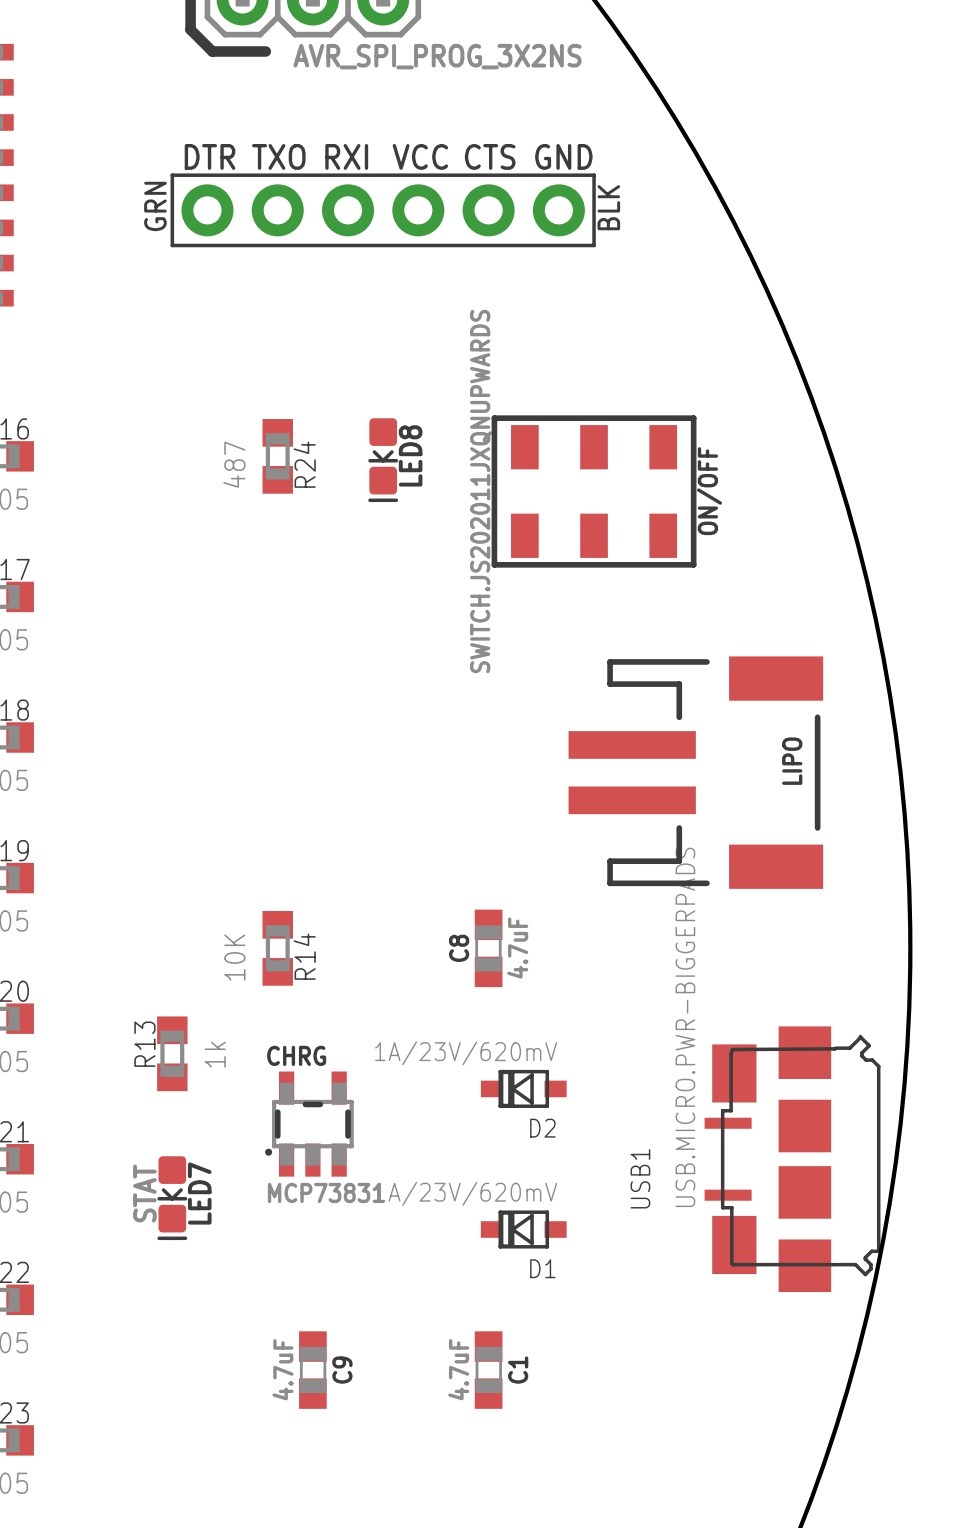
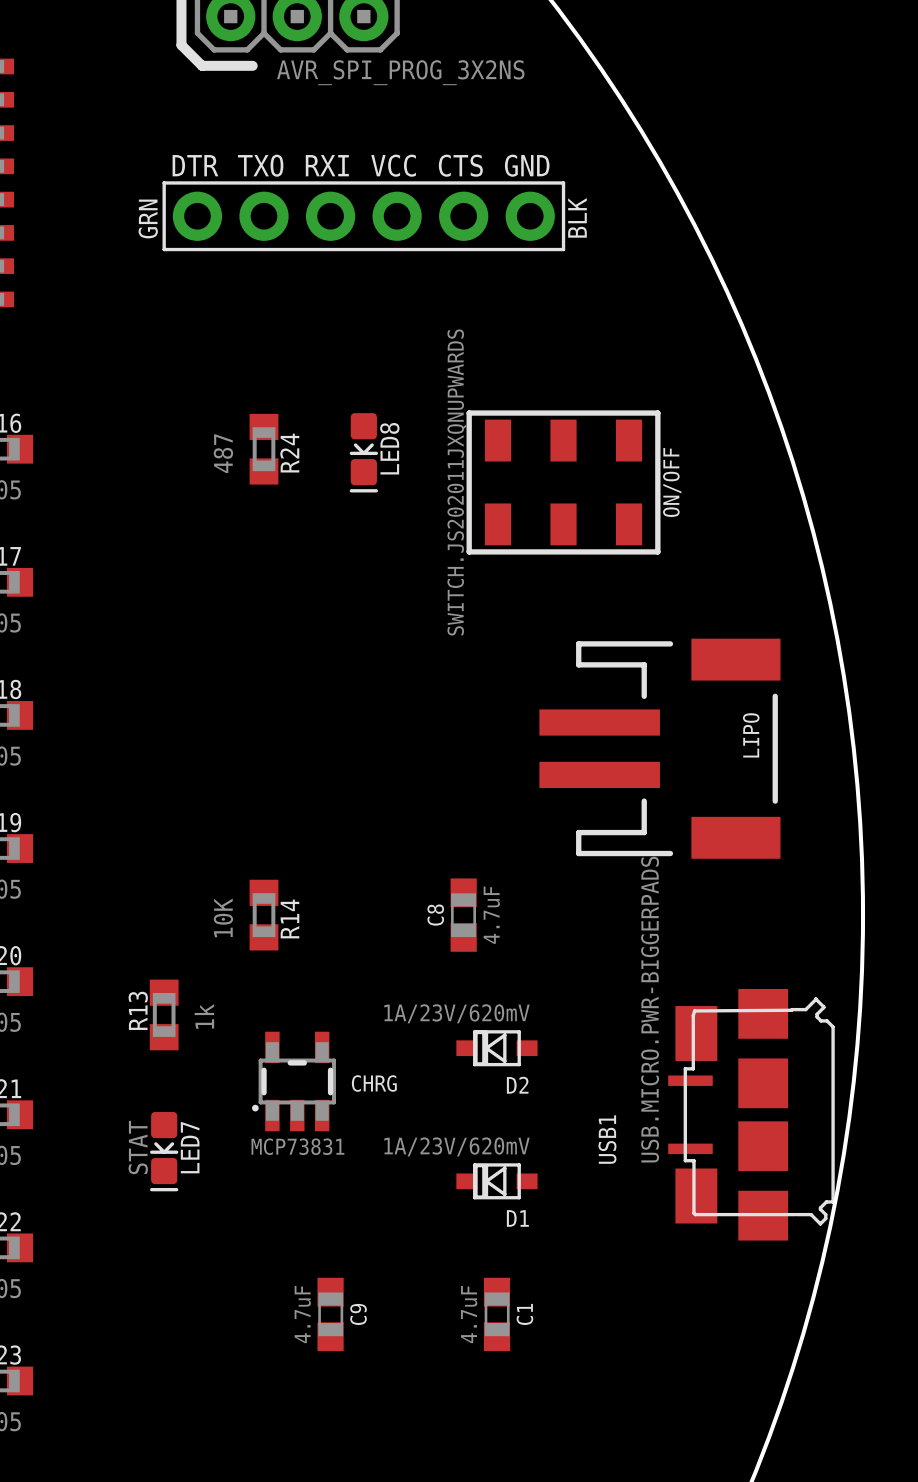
CHRG name position: CHRG (296, 1055) -> CHRG (374, 1083)
C9 position: (312, 1370) -> (330, 1314)
C1 position: (488, 1370) -> (496, 1314)

